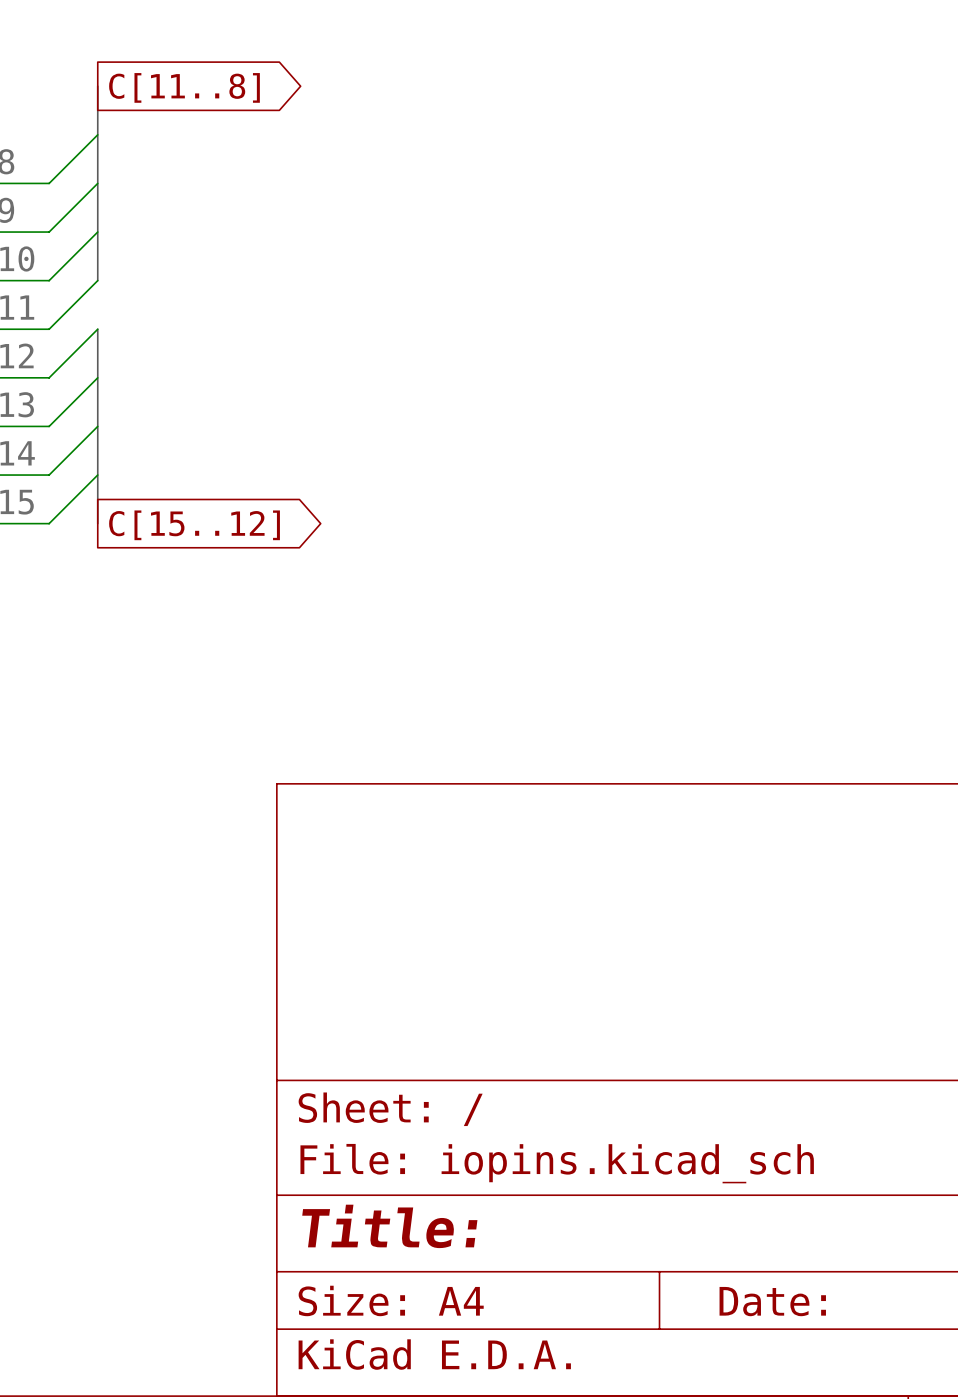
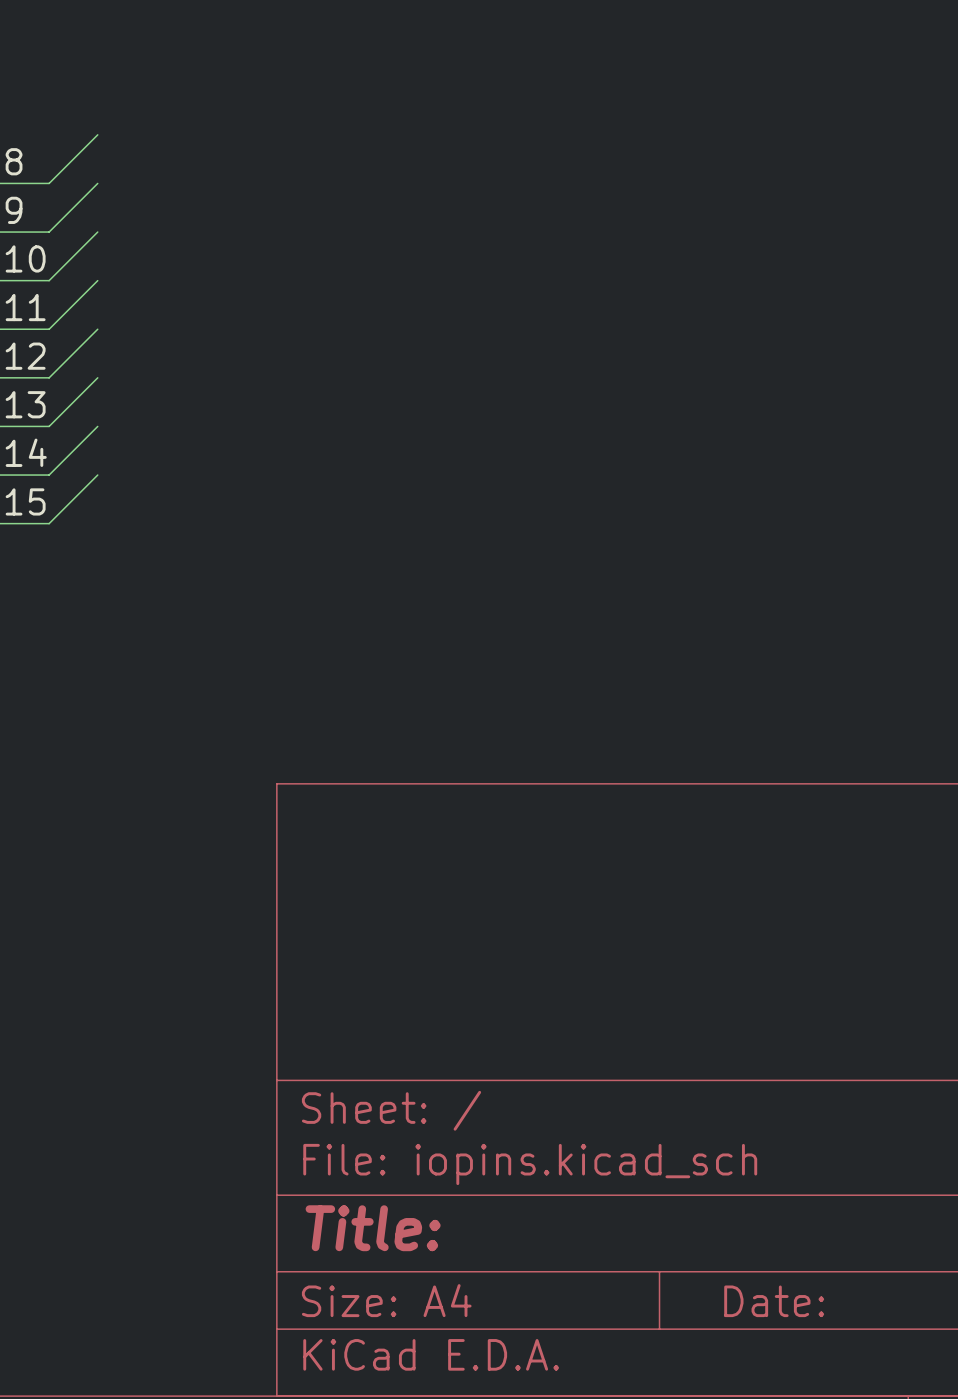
bus: (97, 86) (97, 280) -> none
global label: C[11..8] (184, 87) -> none
bus: (97, 329) (97, 523) -> none
global label: C[15..12] (194, 525) -> none

